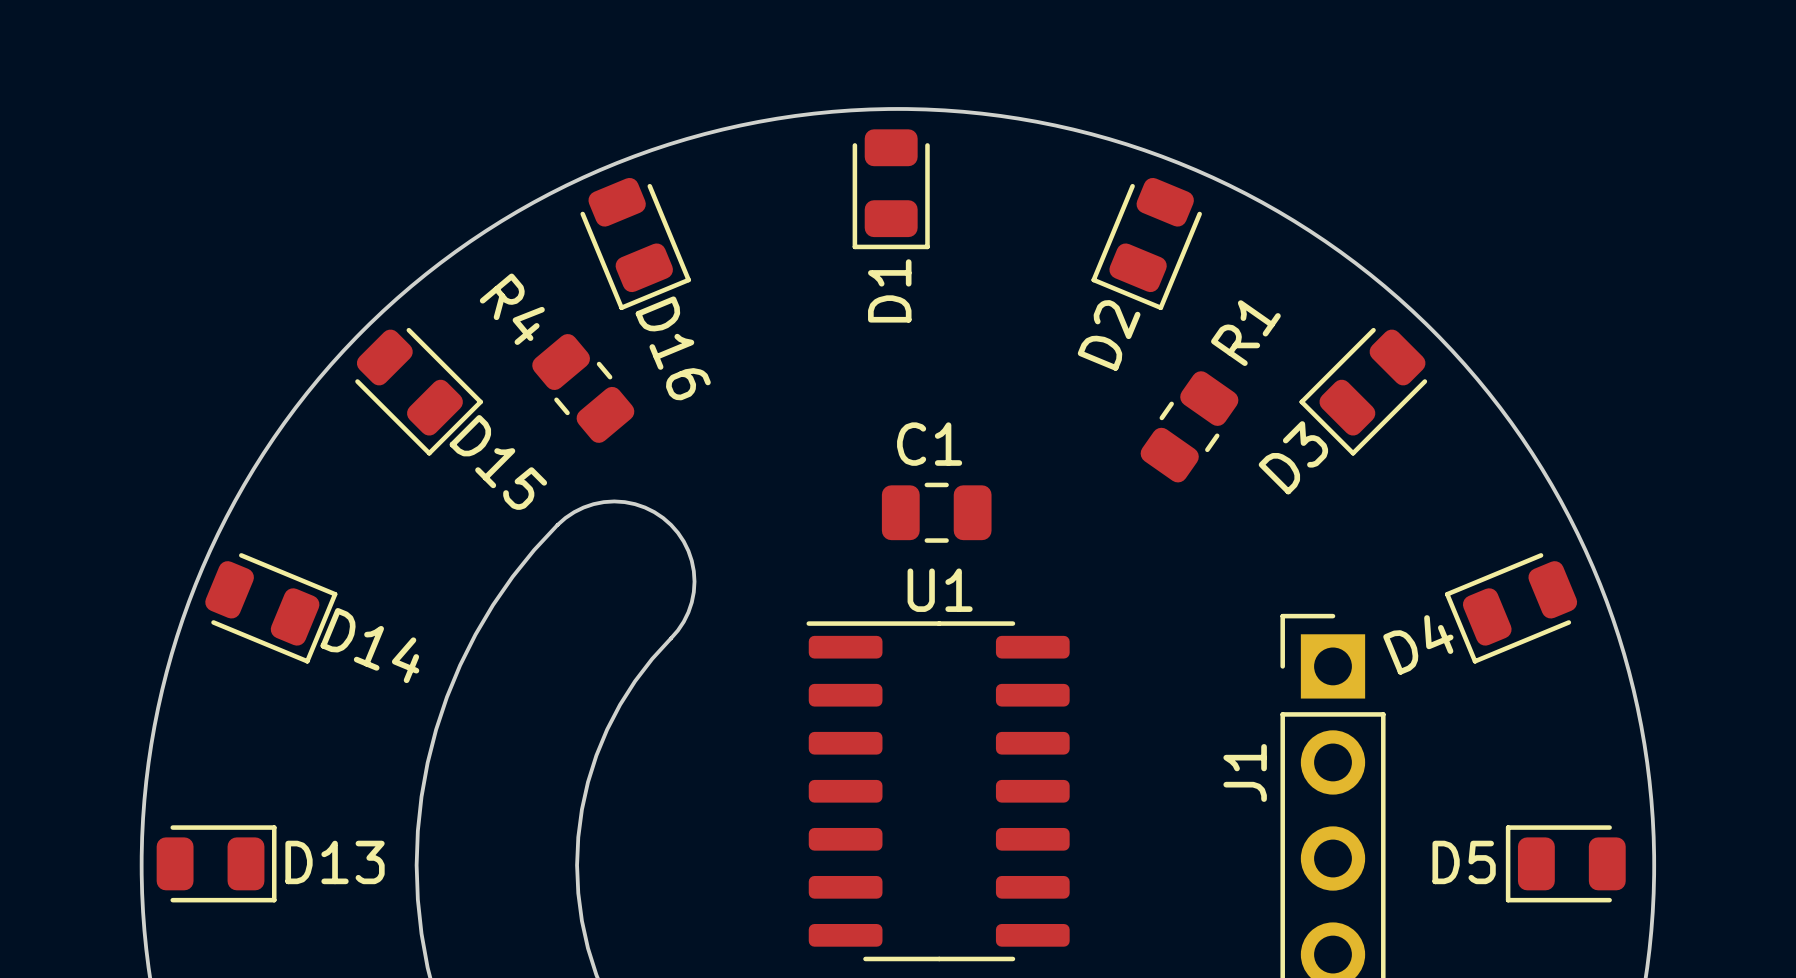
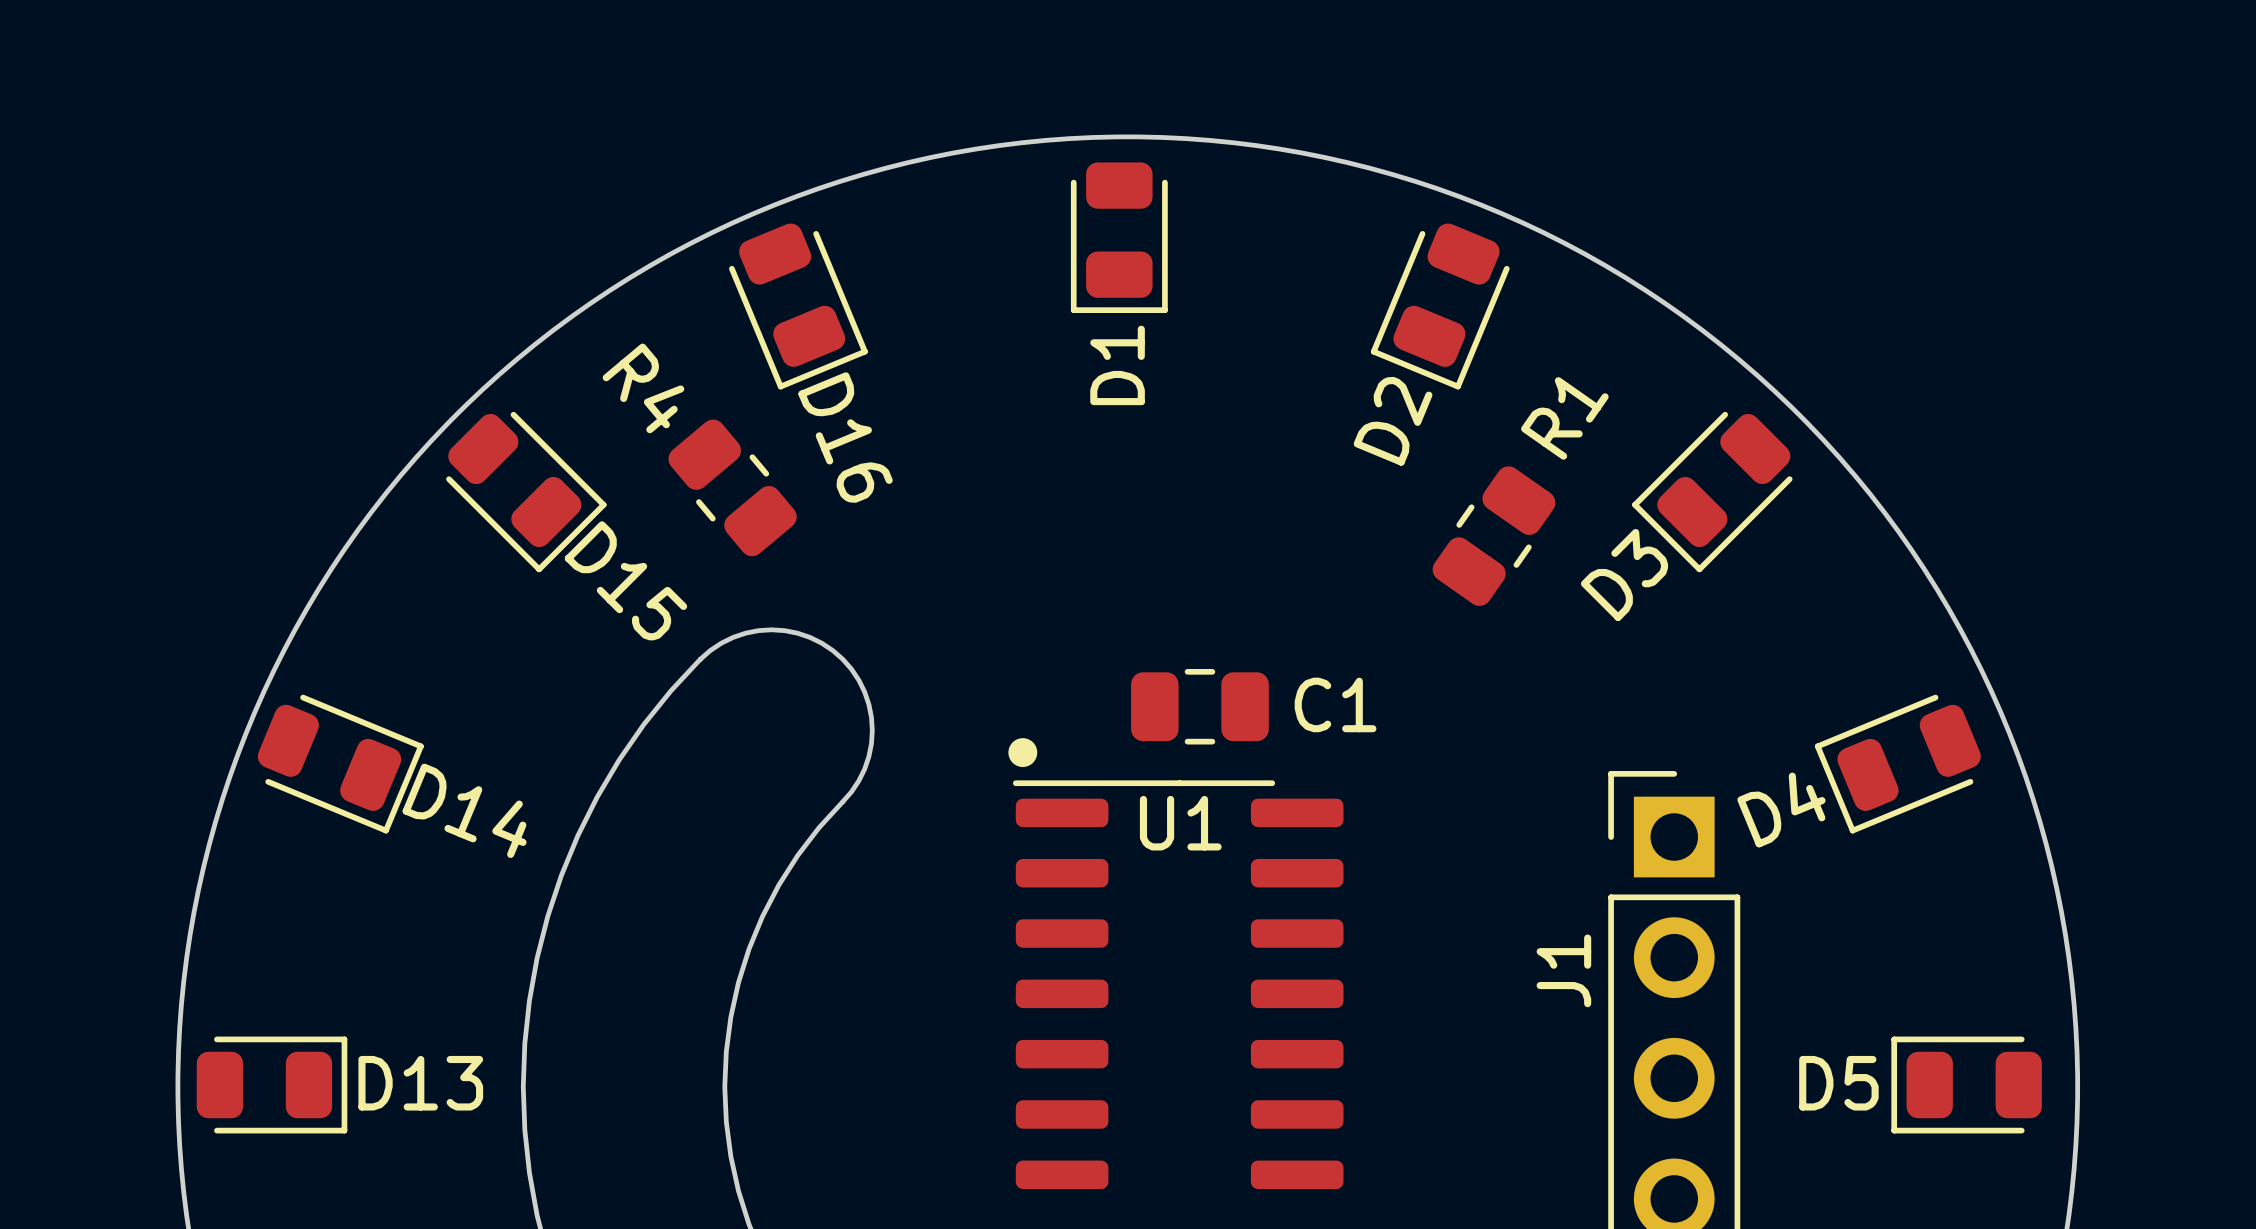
C1 name position: C1 (929, 444) -> C1 (1335, 704)
C1 position: (936, 512) -> (1199, 706)
U1 name position: U1 (940, 590) -> U1 (1180, 823)
U1 footprint: [806, 621, 1070, 962] -> [1008, 738, 1344, 1190]

